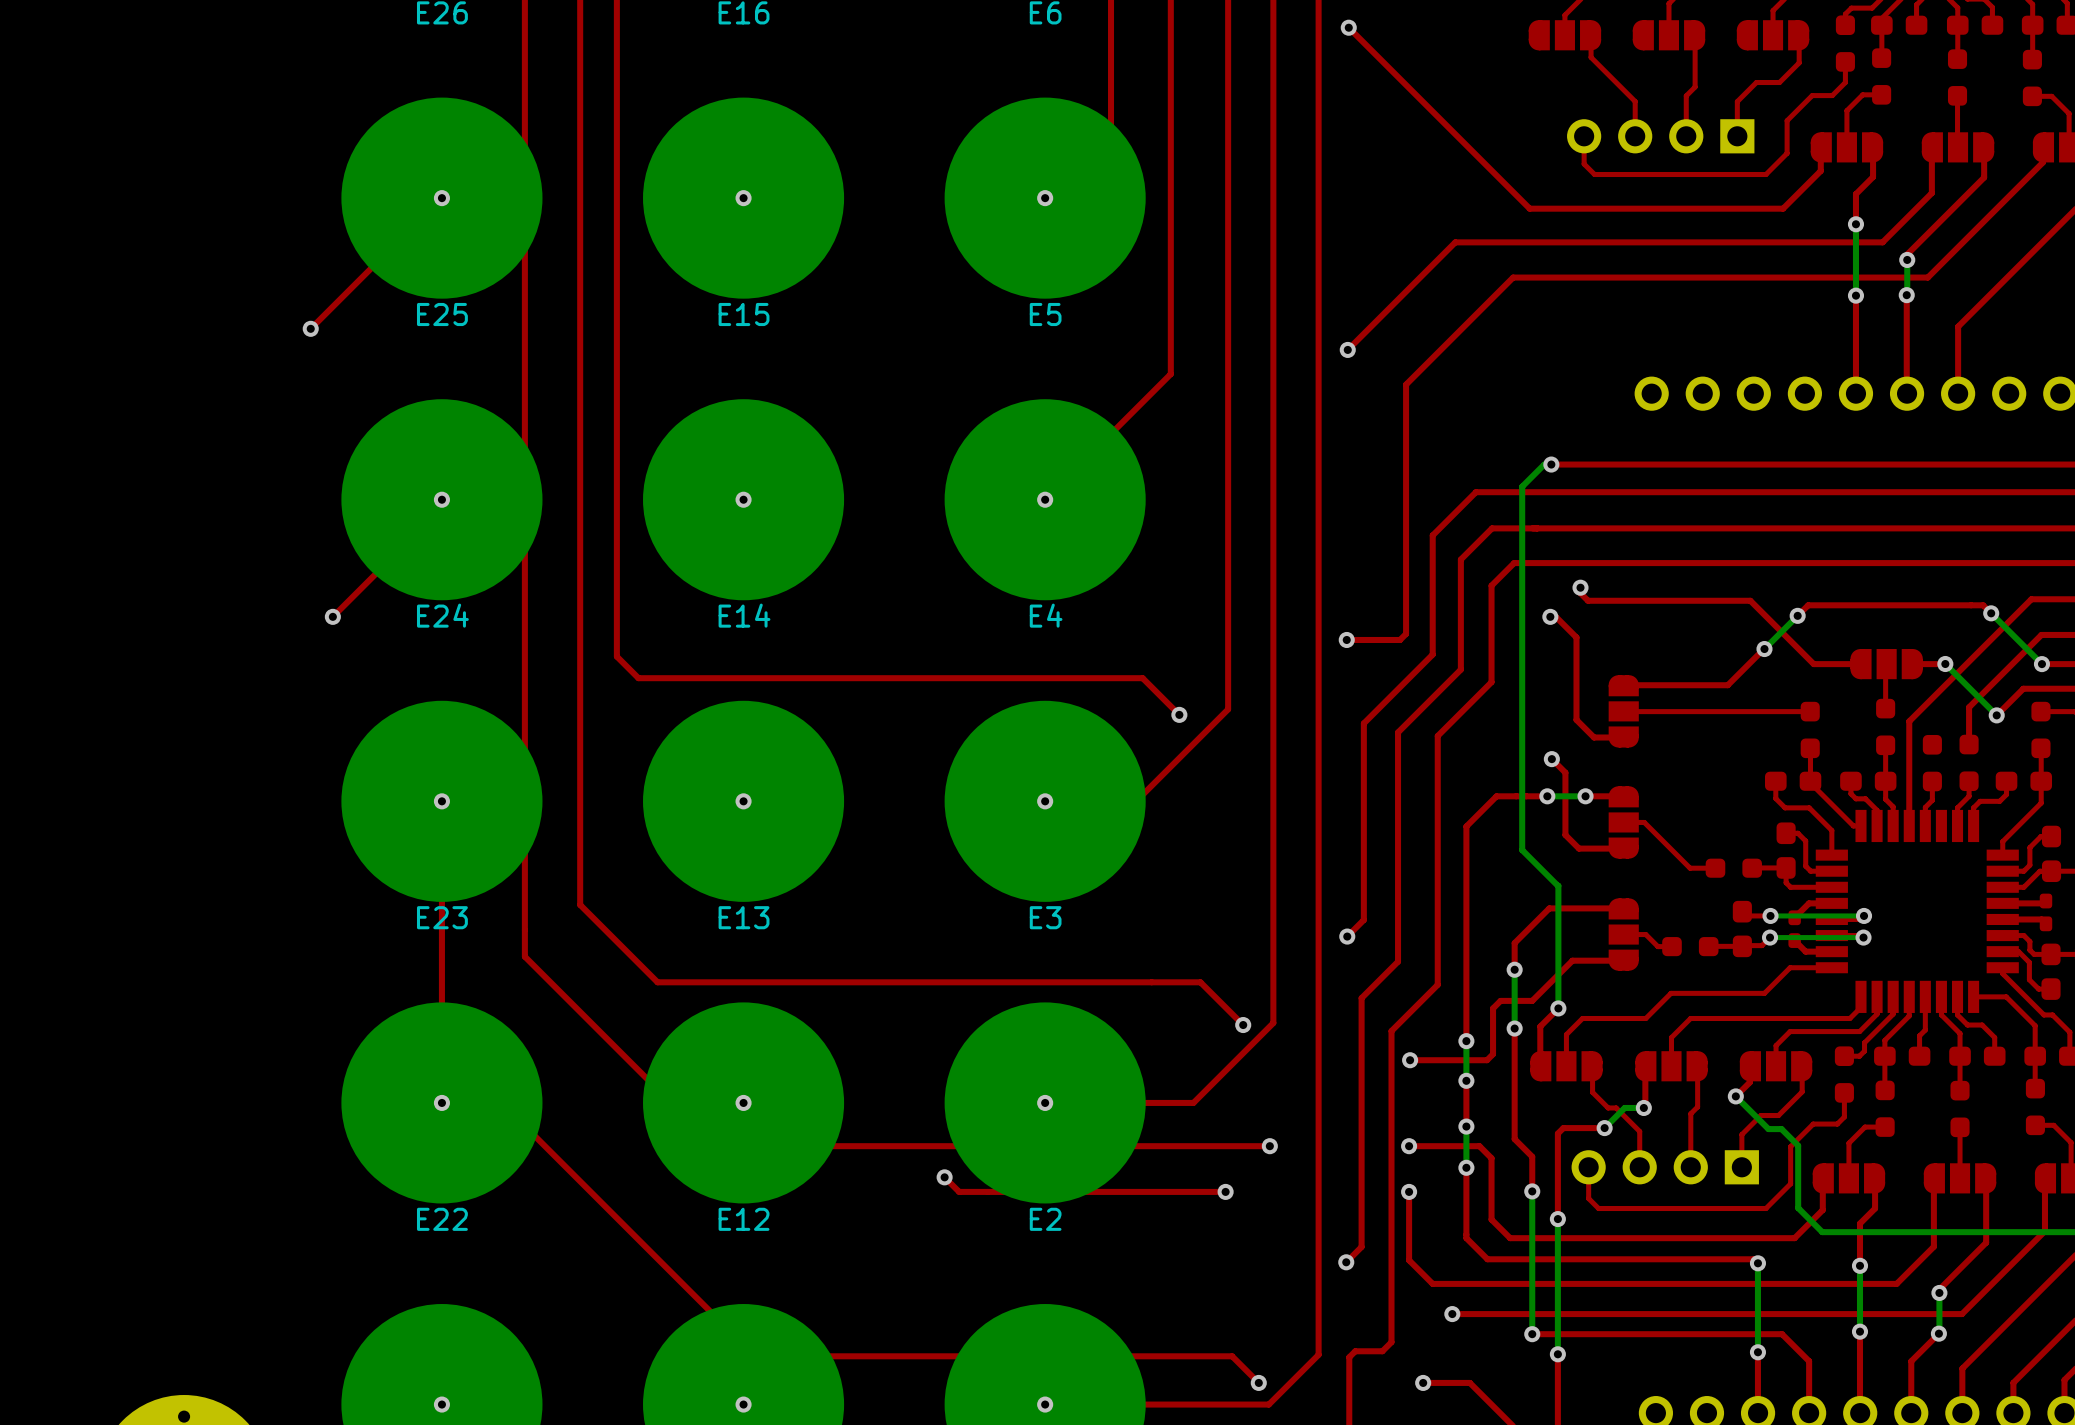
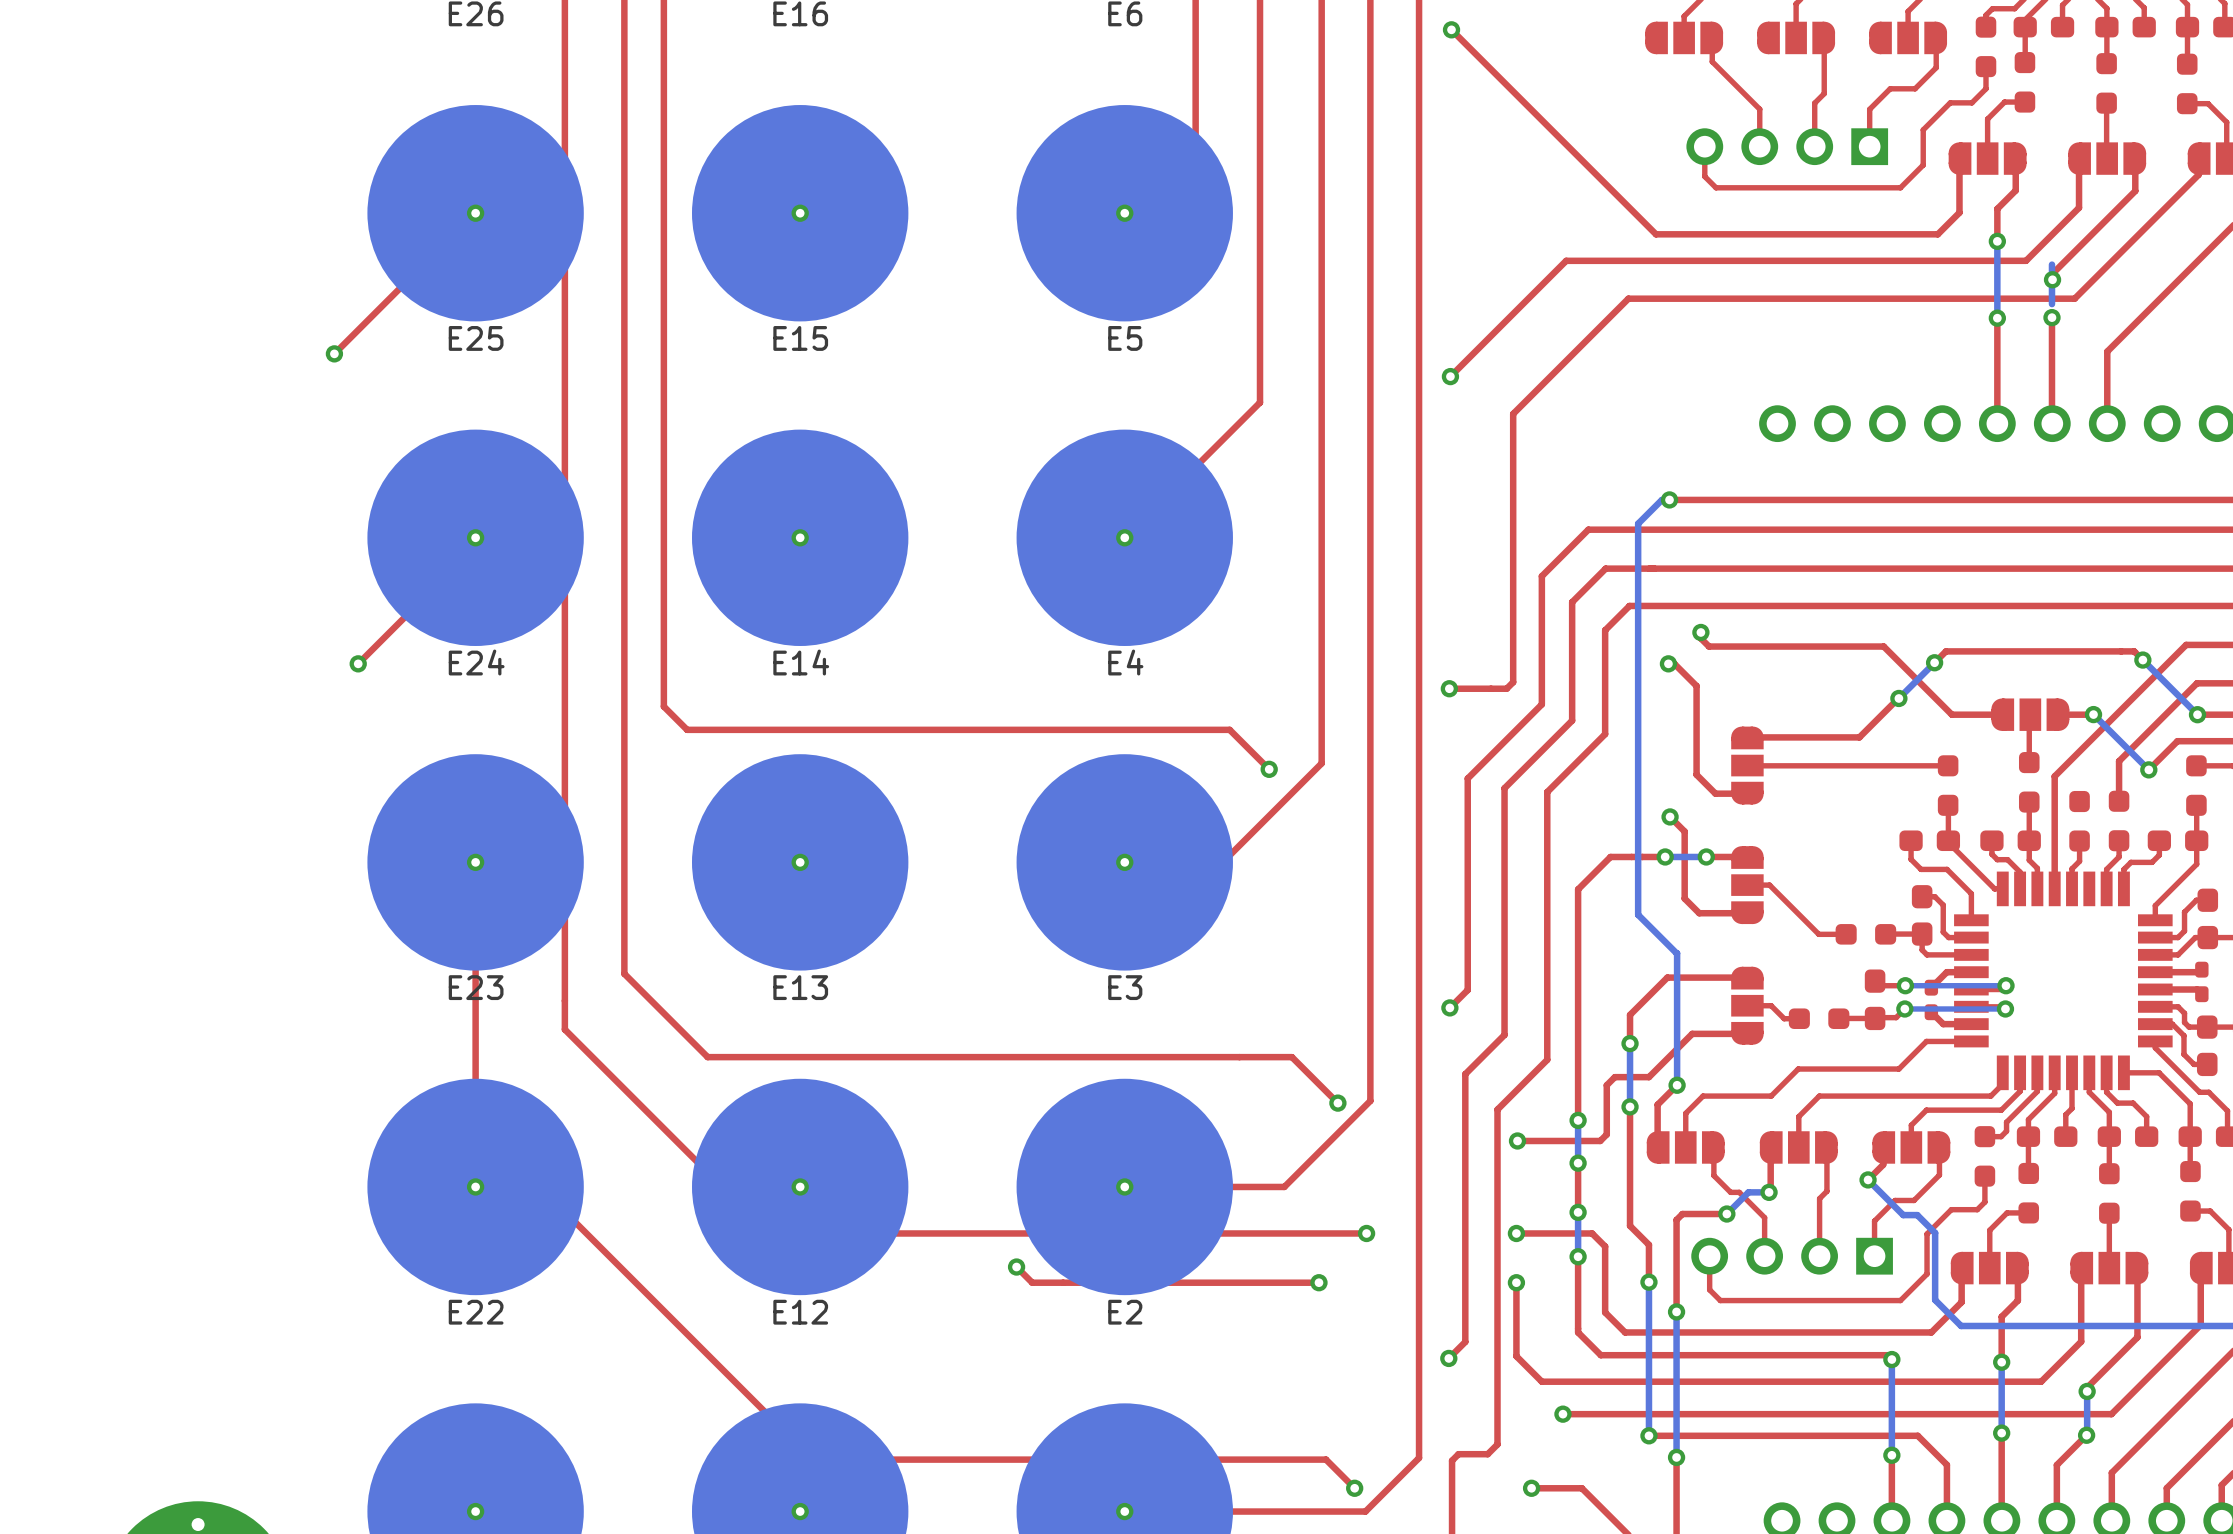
top track: (1820, 170) (1783, 208) (1529, 208) -> (1959, 184) (1959, 212) (1937, 234) (1656, 234) (1646, 224)
bottom track: none -> (2051, 264) (2051, 304)
bottom track: (1907, 259) (1906, 295) -> none

